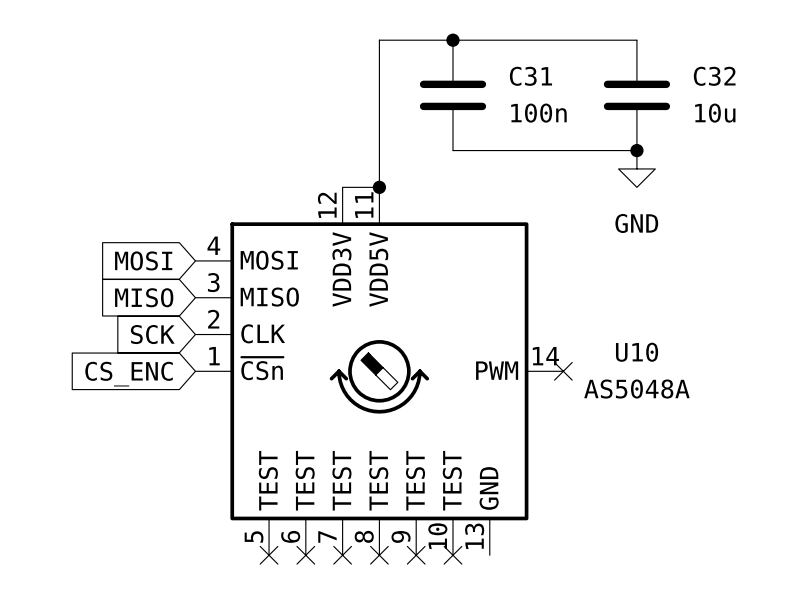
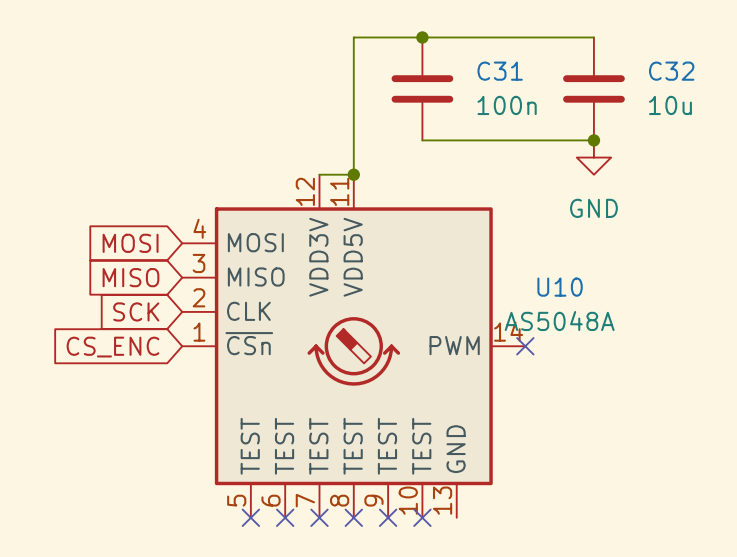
U10 name position: U10 (637, 352) -> U10 (560, 287)
U10 value position: AS5048A (636, 389) -> AS5048A (559, 321)

